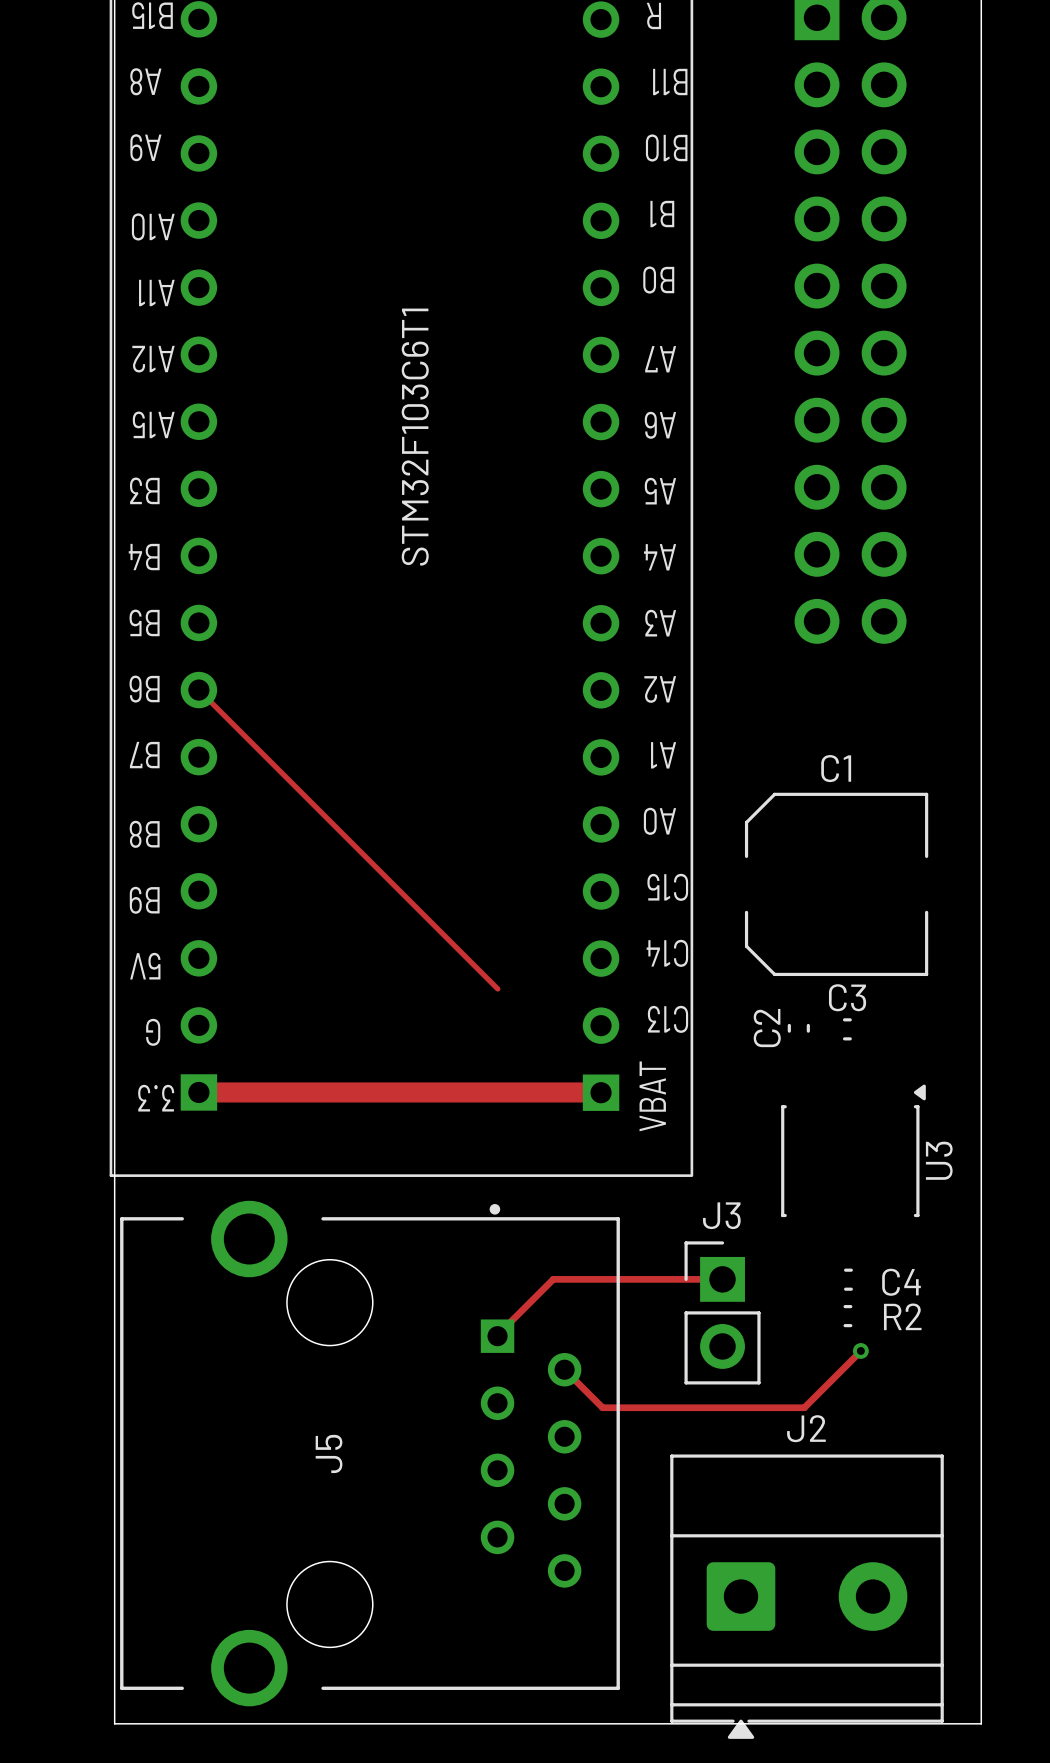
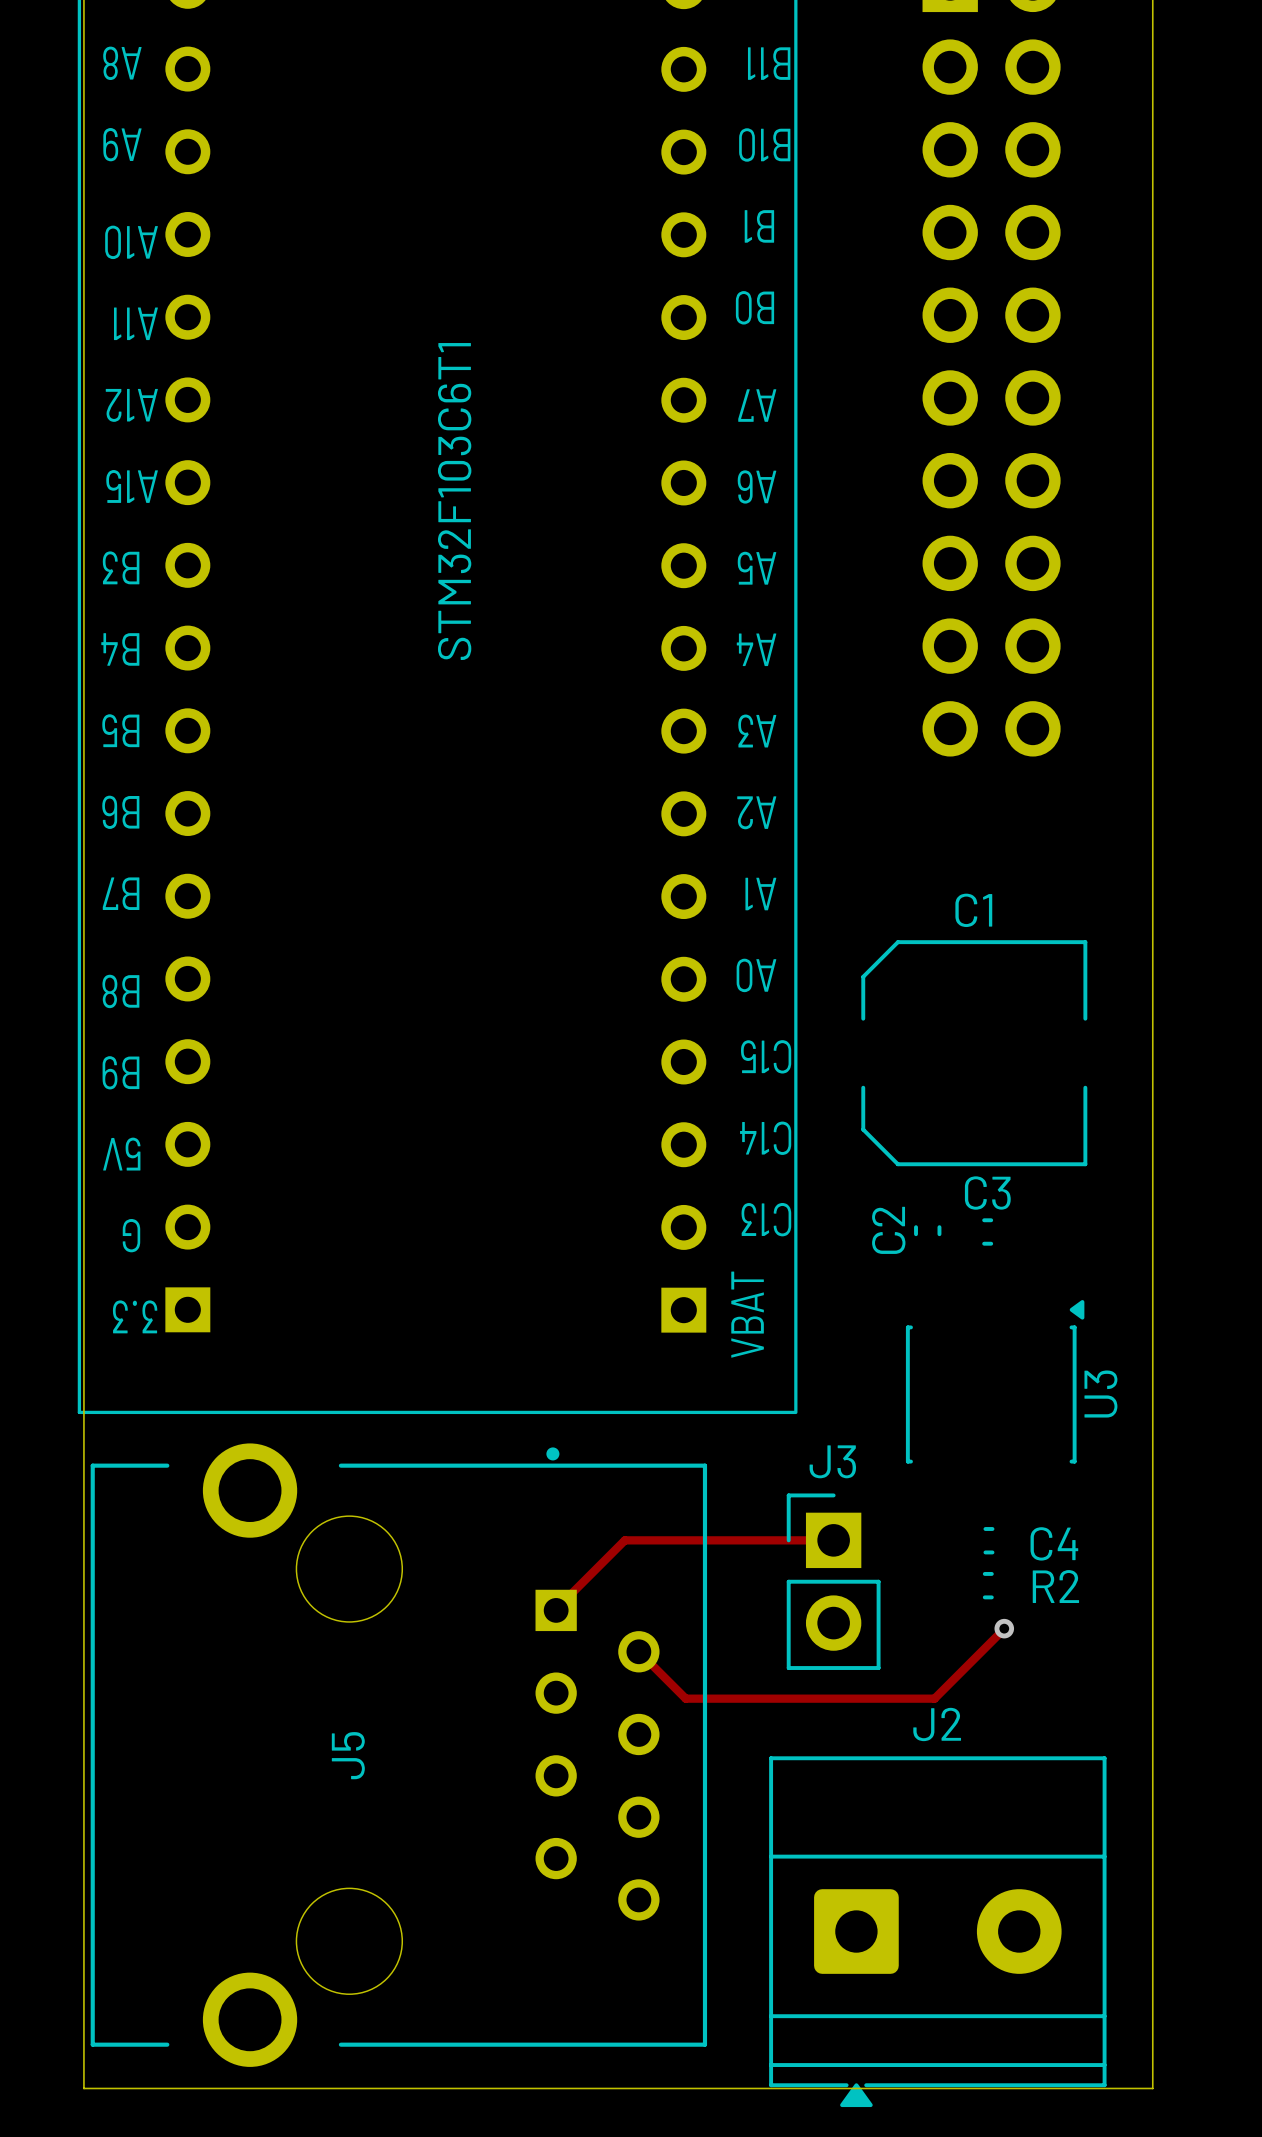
track: (198, 690) (497, 988) -> none
track: (198, 1092) (600, 1092) -> none

